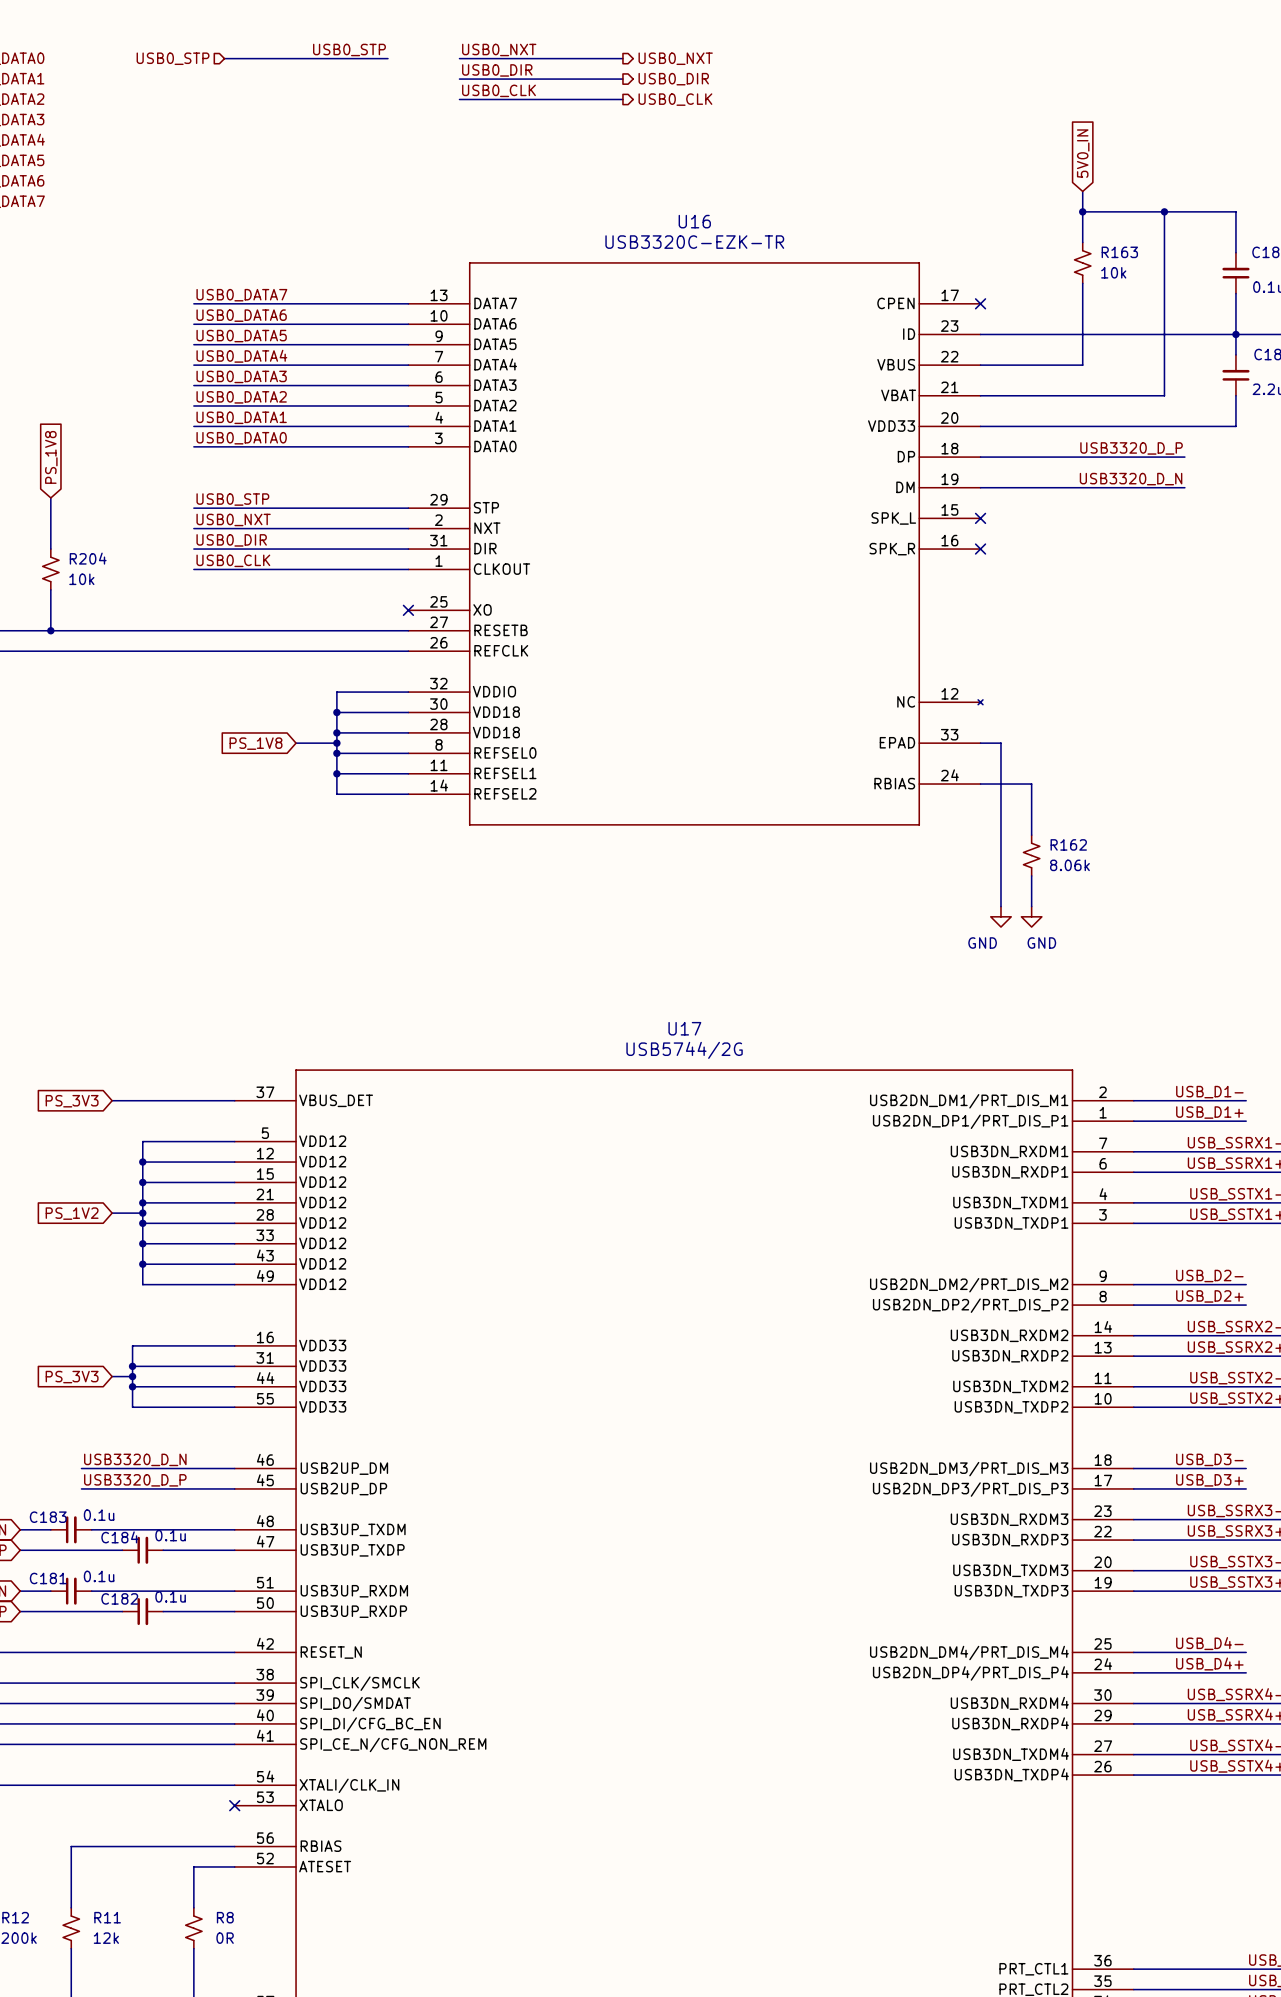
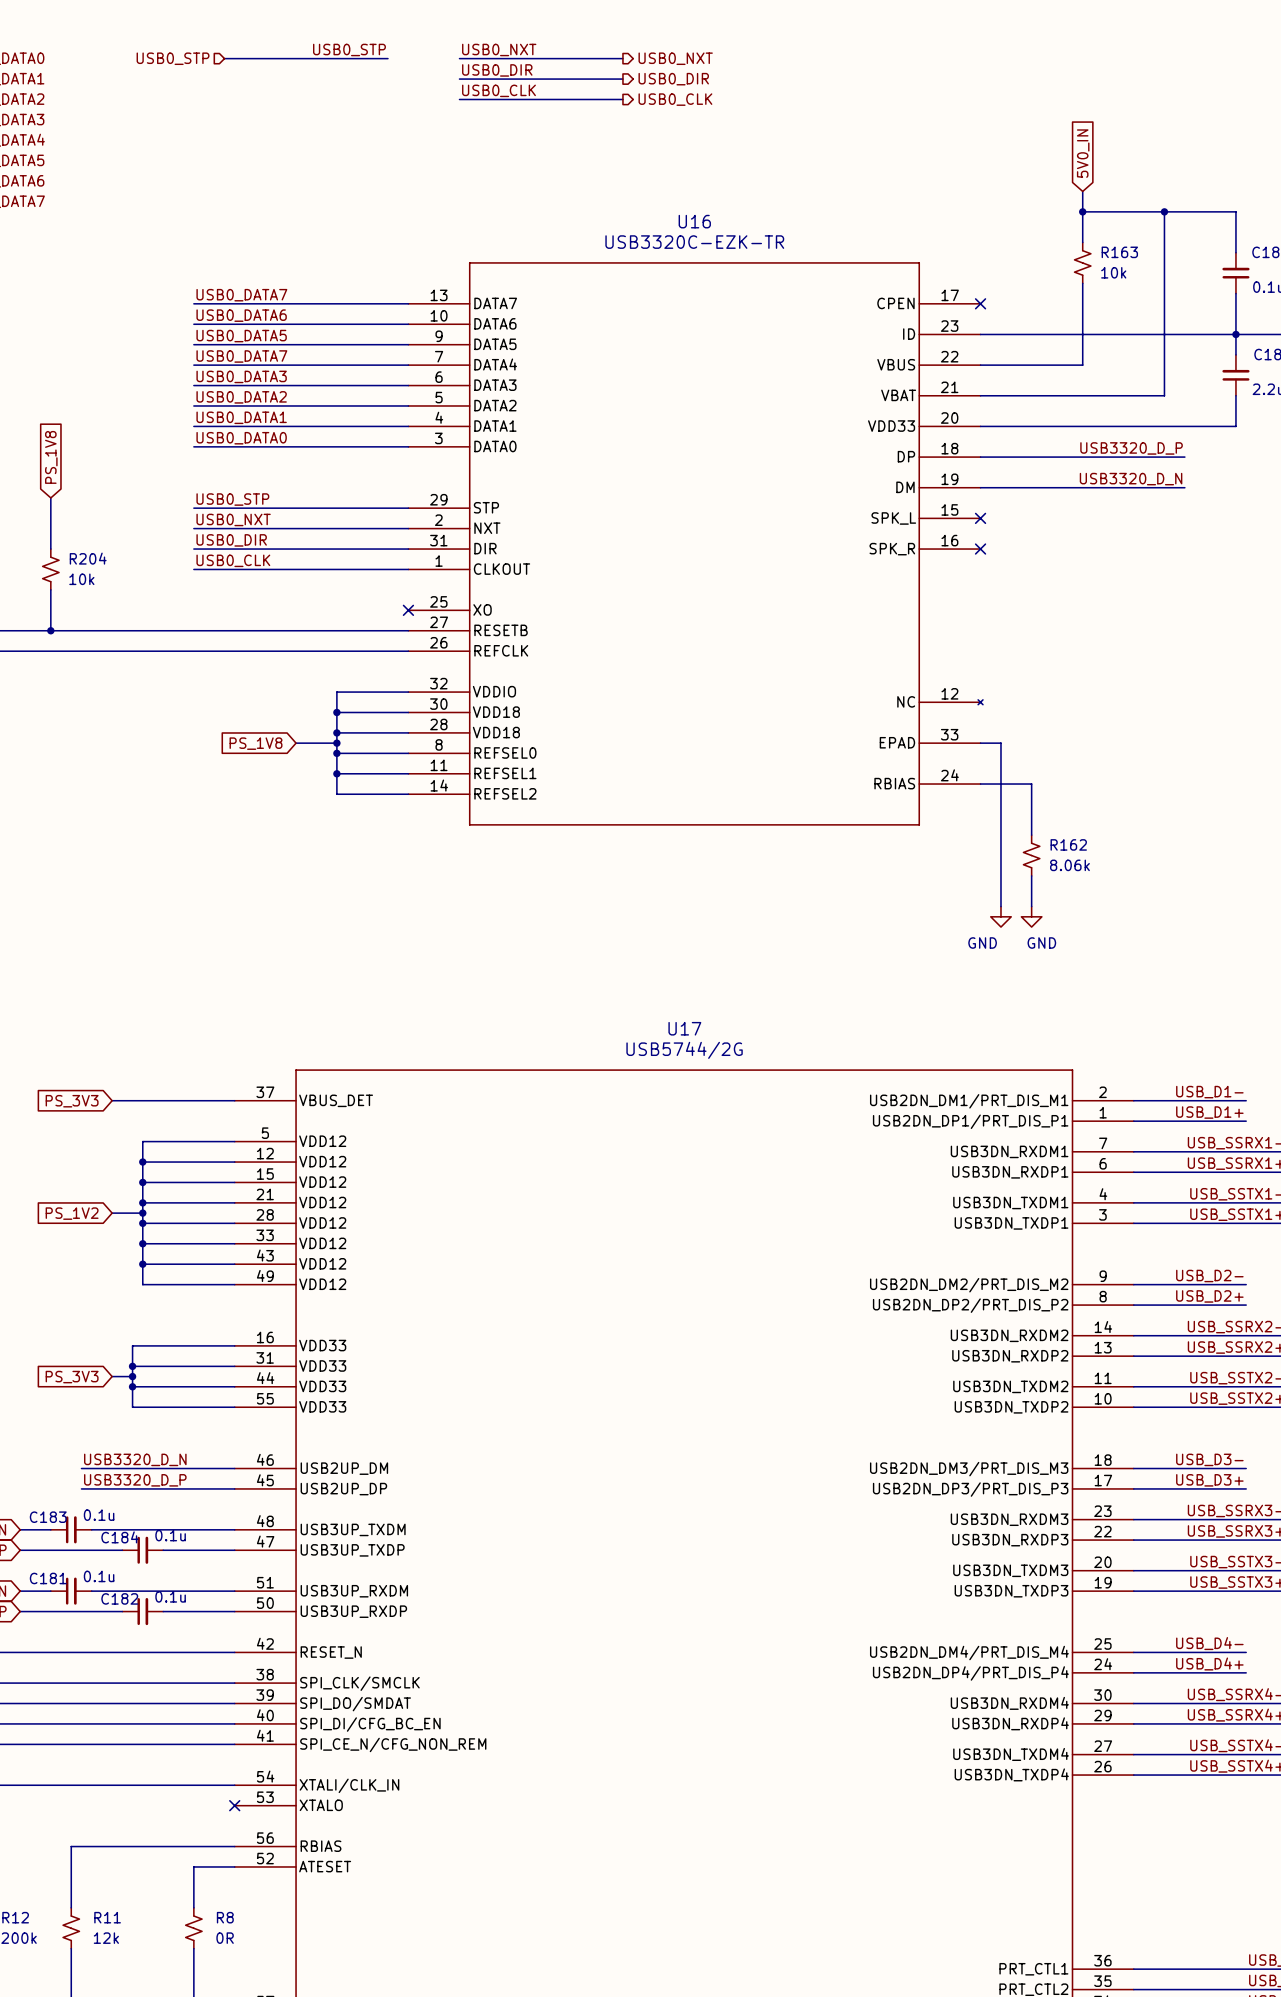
label: USB0_DATA4 (241, 356) -> USB0_DATA7 (241, 356)

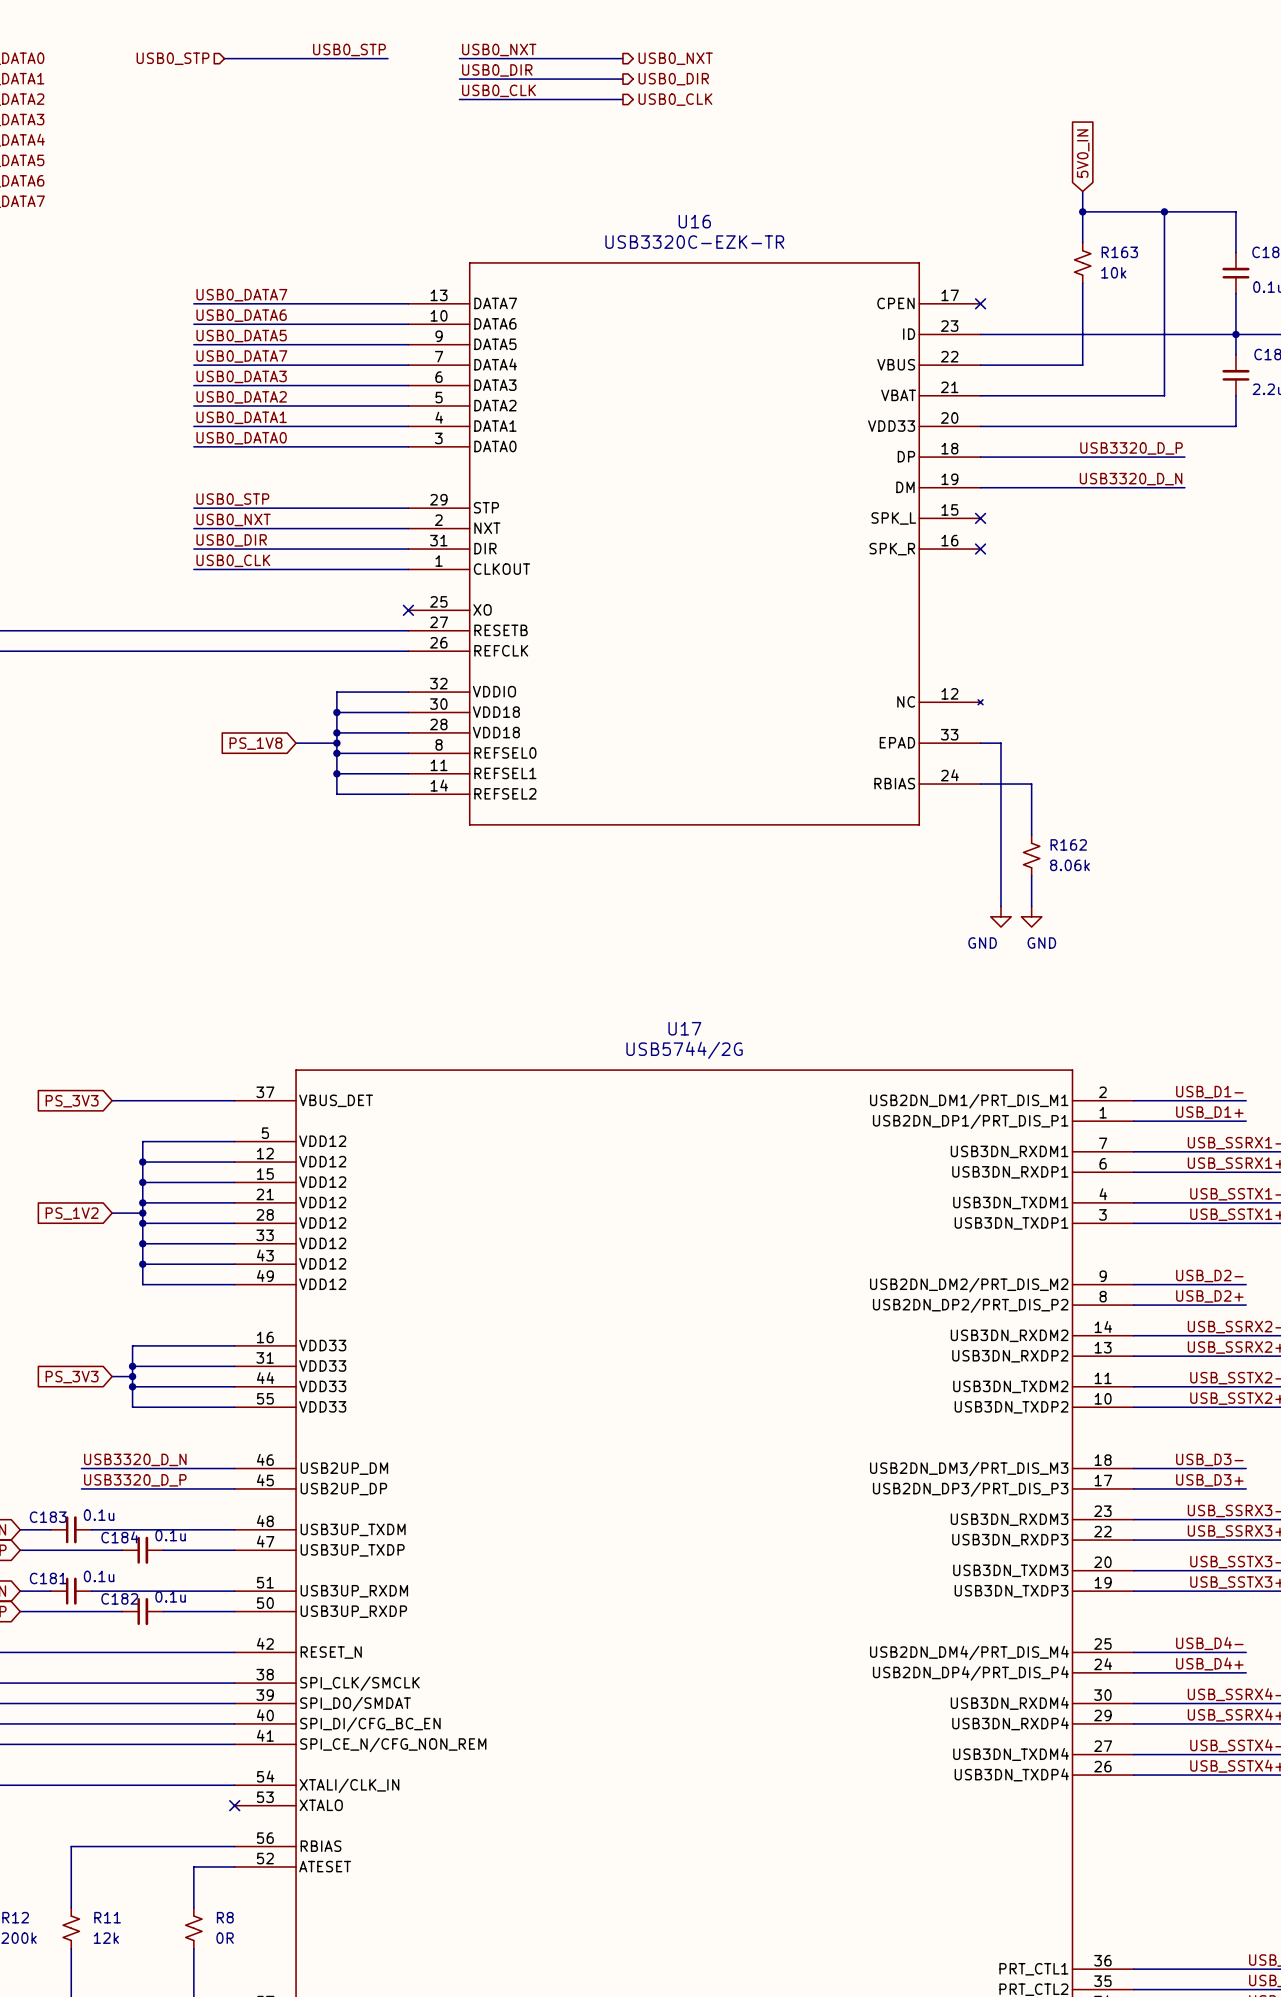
global label: PS_1V8 (51, 457) -> none
wire: (50, 497) (50, 549) -> none
R204: 10k (50, 569) -> none
wire: (50, 589) (50, 630) -> none
junction: (50, 630) -> none

